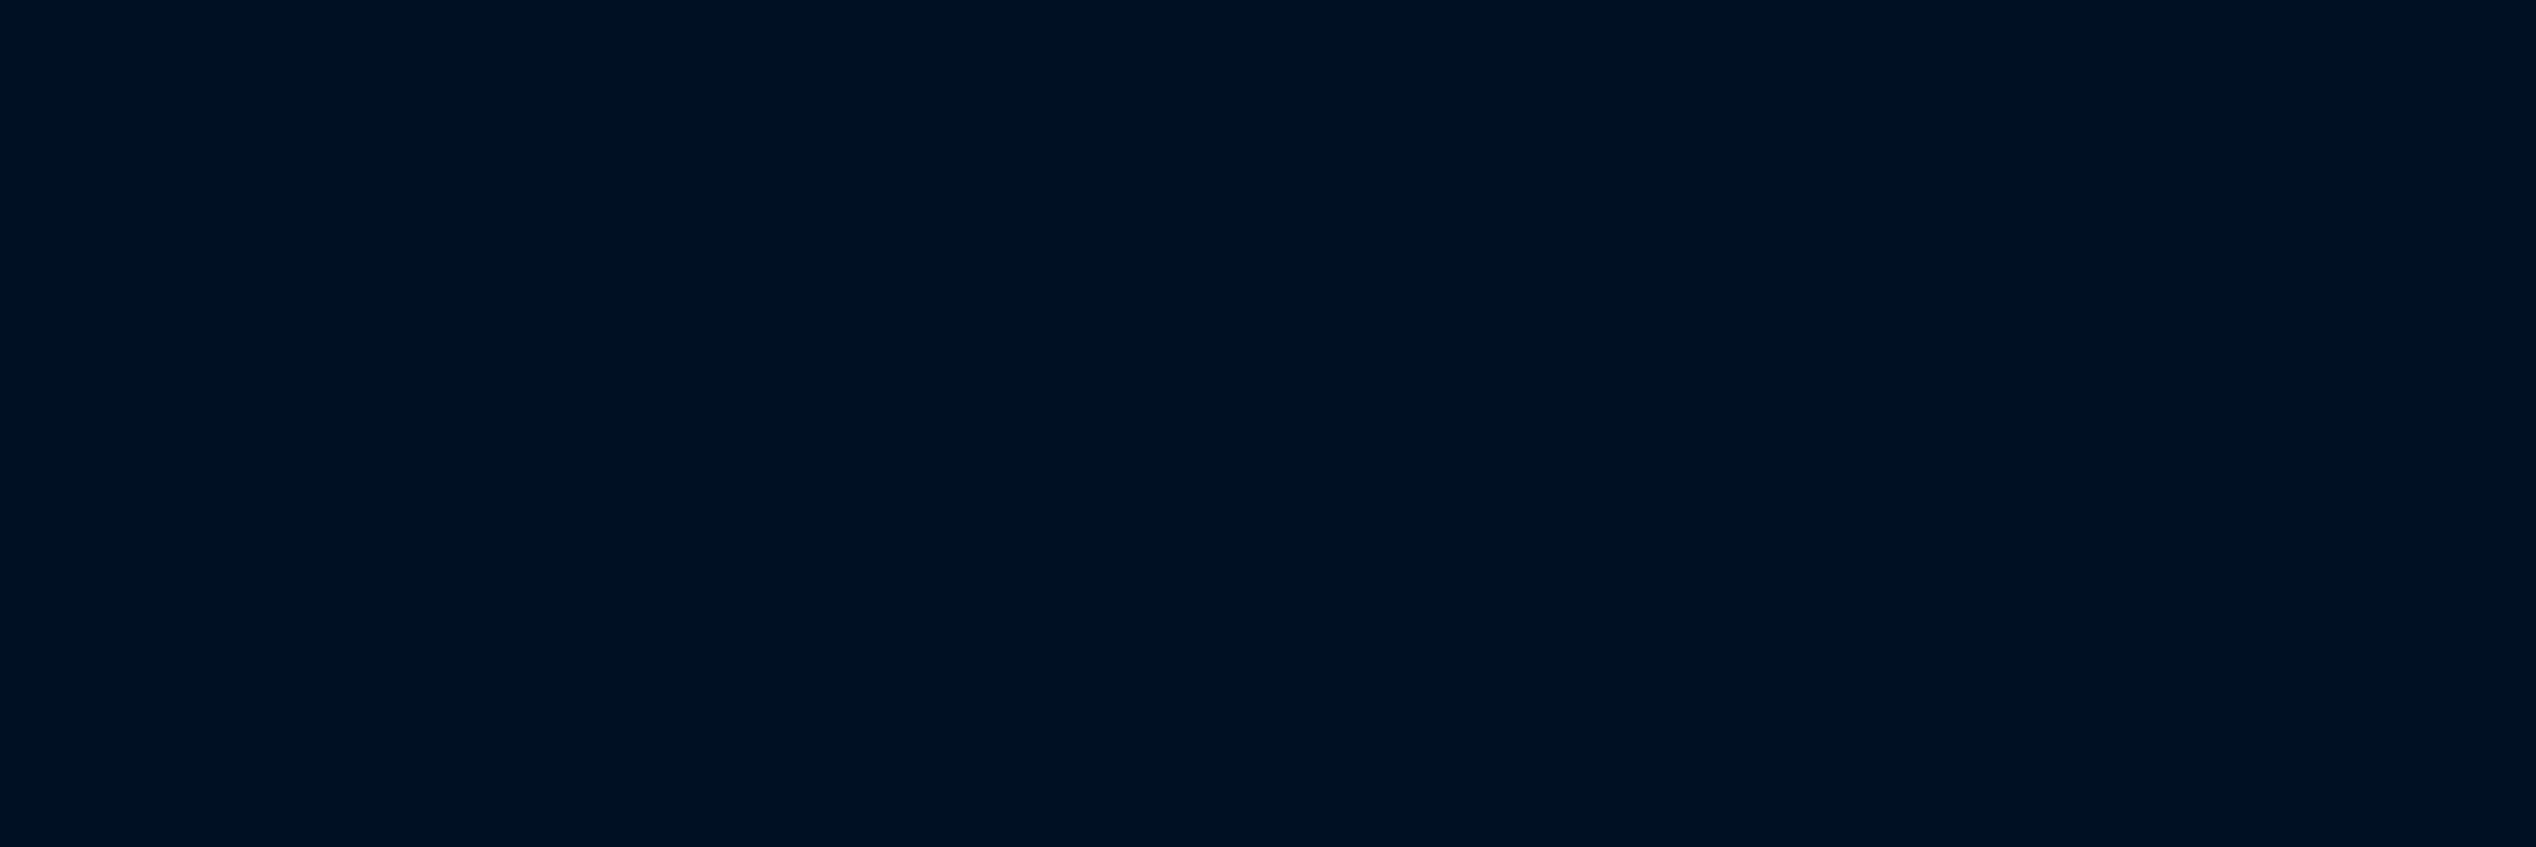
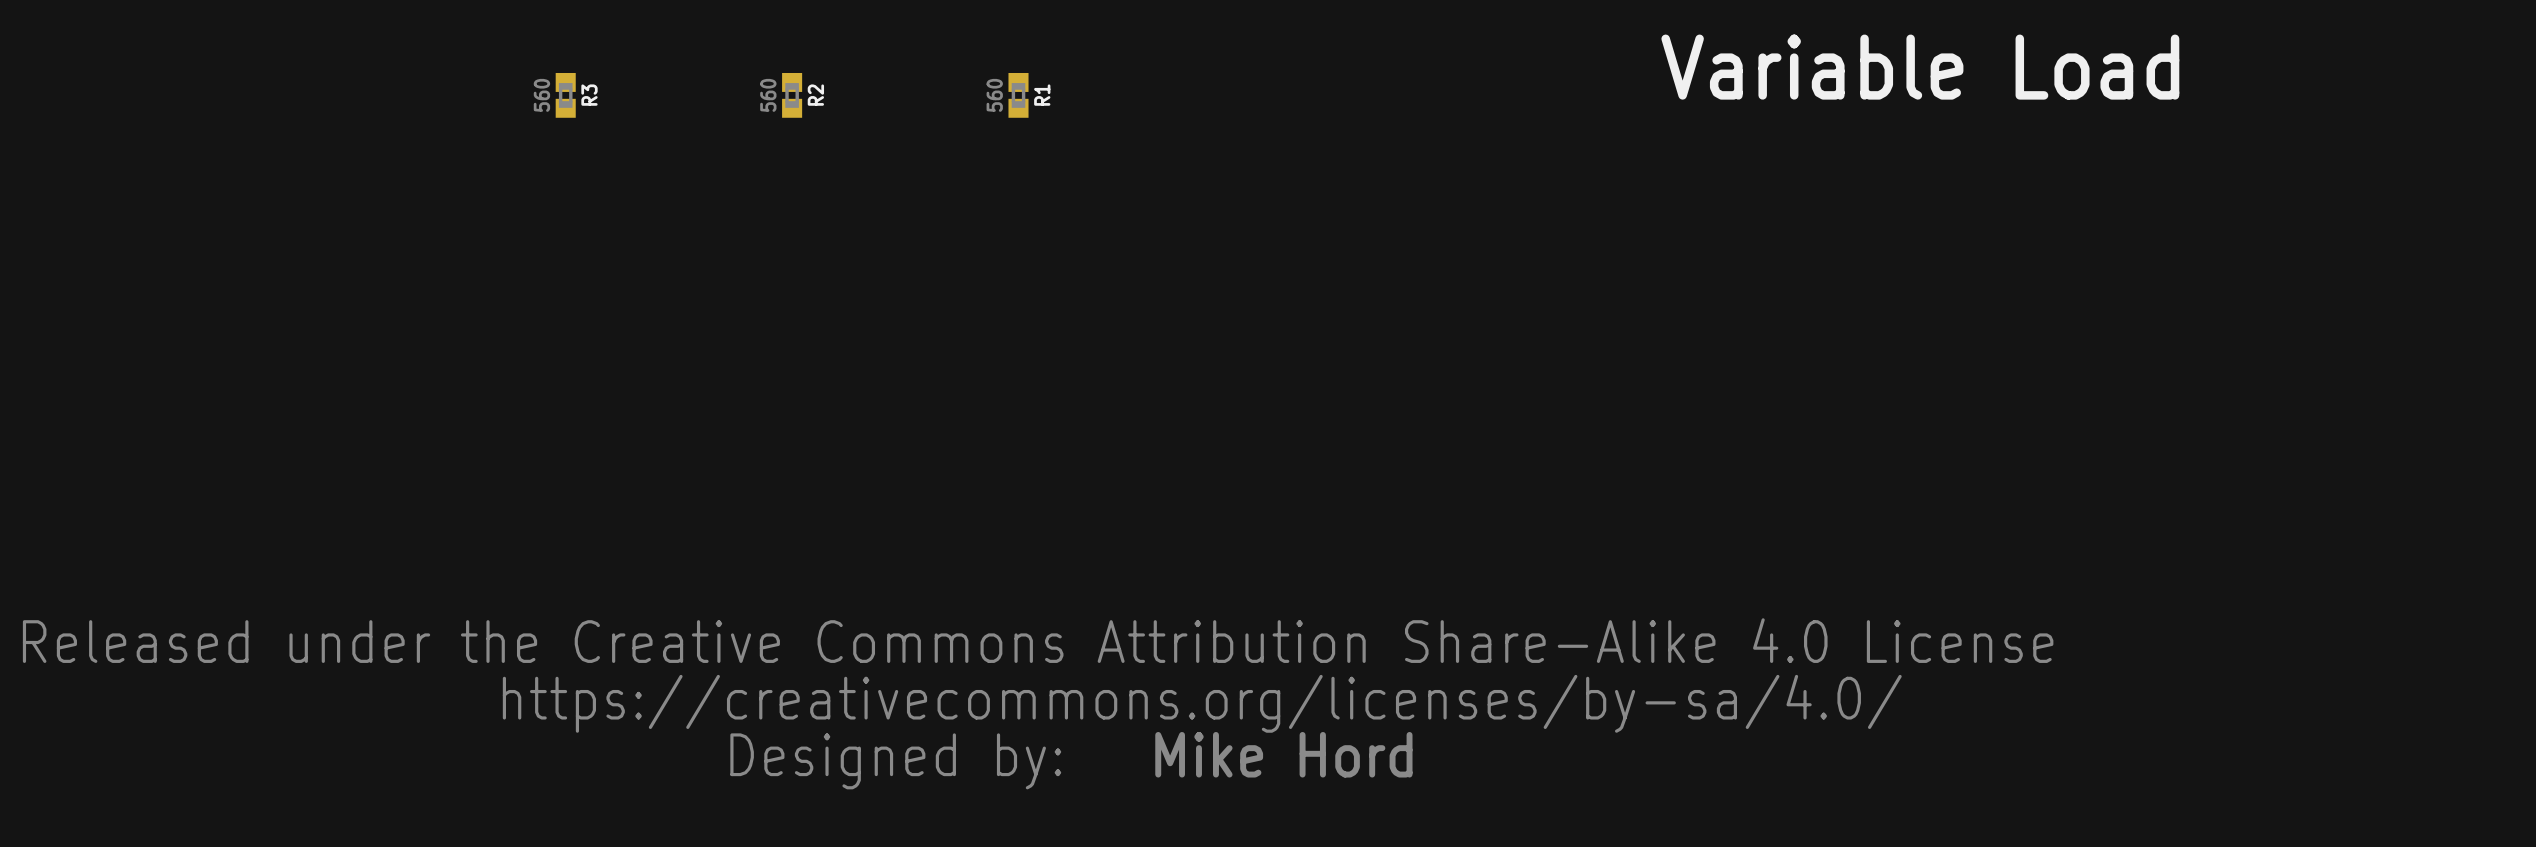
text: none -> Variable Load (1920, 67)
R3: none -> 560 (565, 95)
R2: none -> 560 (792, 95)
R1: none -> 560 (1018, 95)
drawing: none -> [22, 618, 2054, 790]
text: none -> Mike Hord (1283, 754)

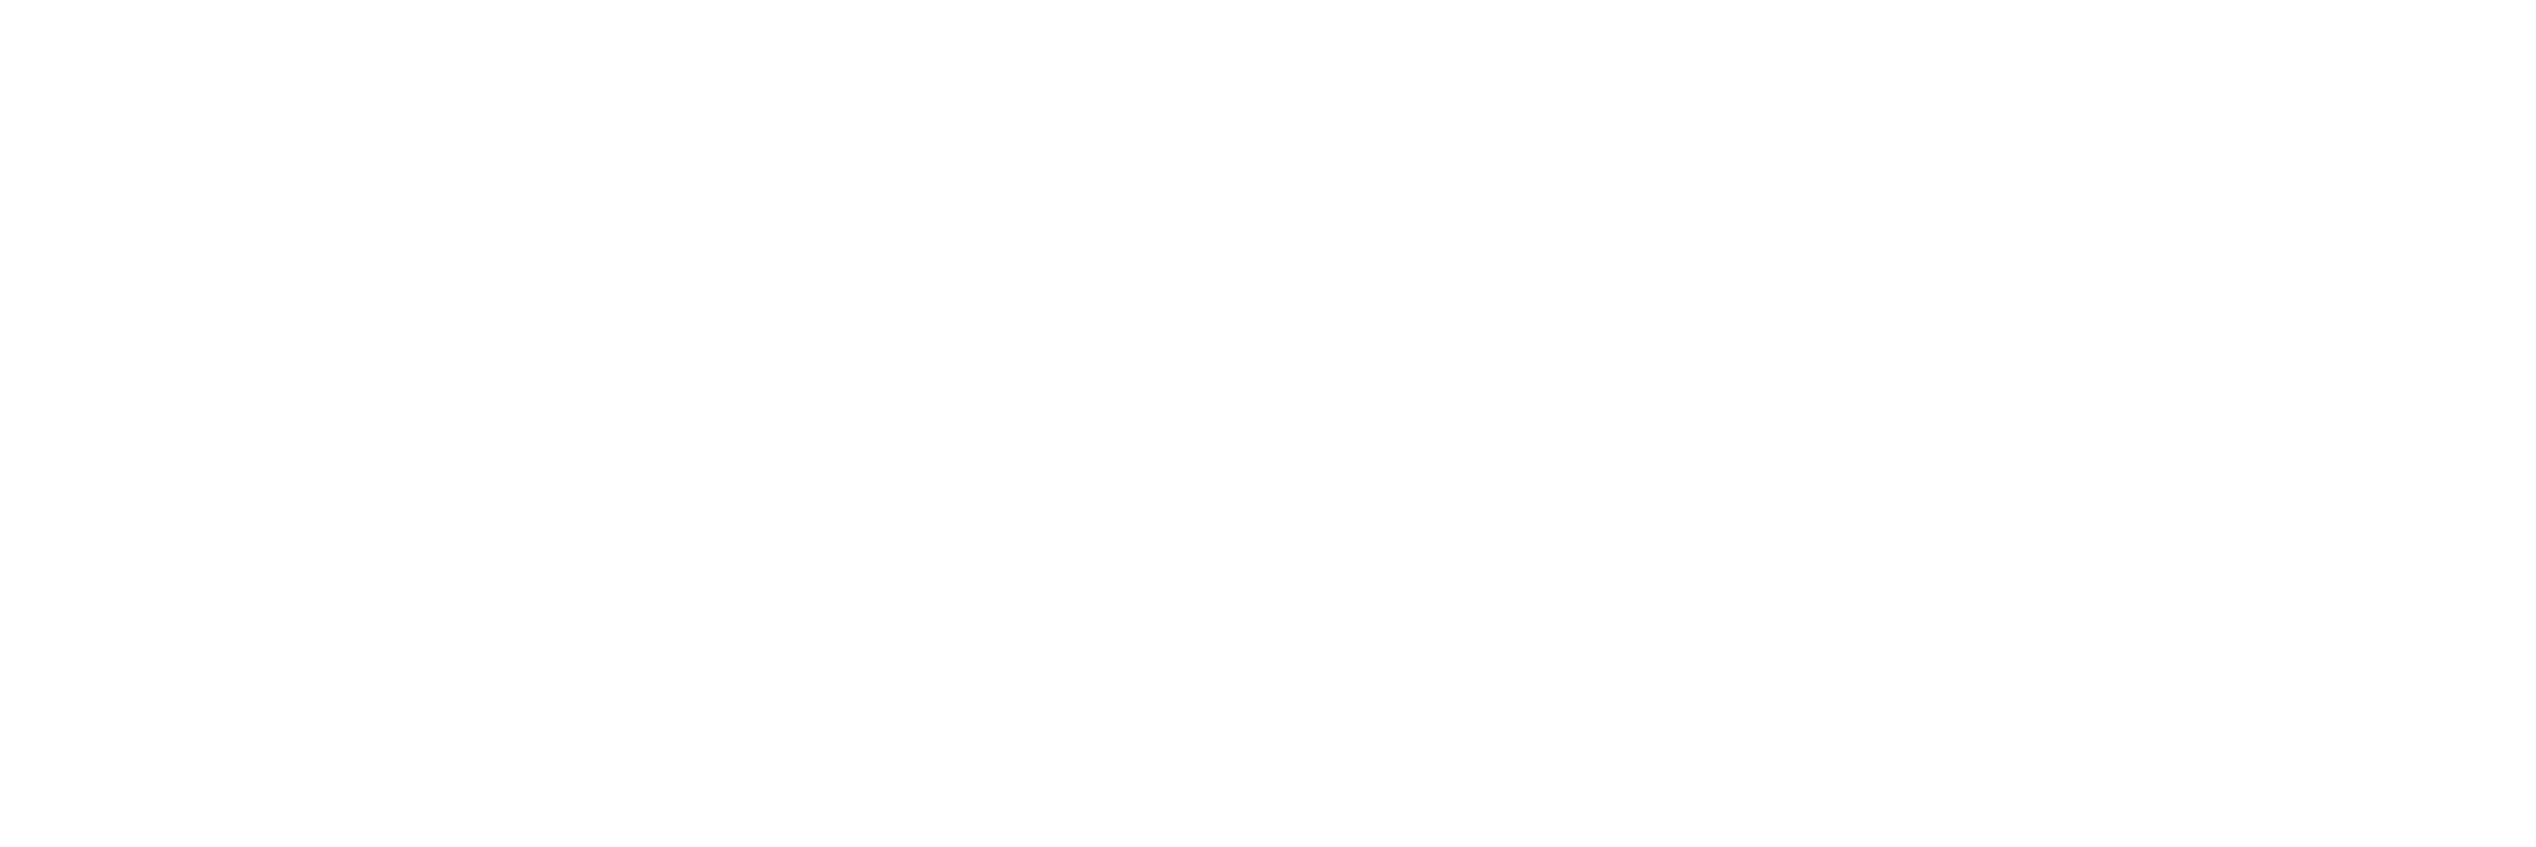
text: Variable Load (1920, 67) -> none
R3: 560 (565, 95) -> none
R2: 560 (792, 95) -> none
R1: 560 (1018, 95) -> none
drawing: [22, 618, 2054, 790] -> none
text: Mike Hord (1283, 754) -> none

